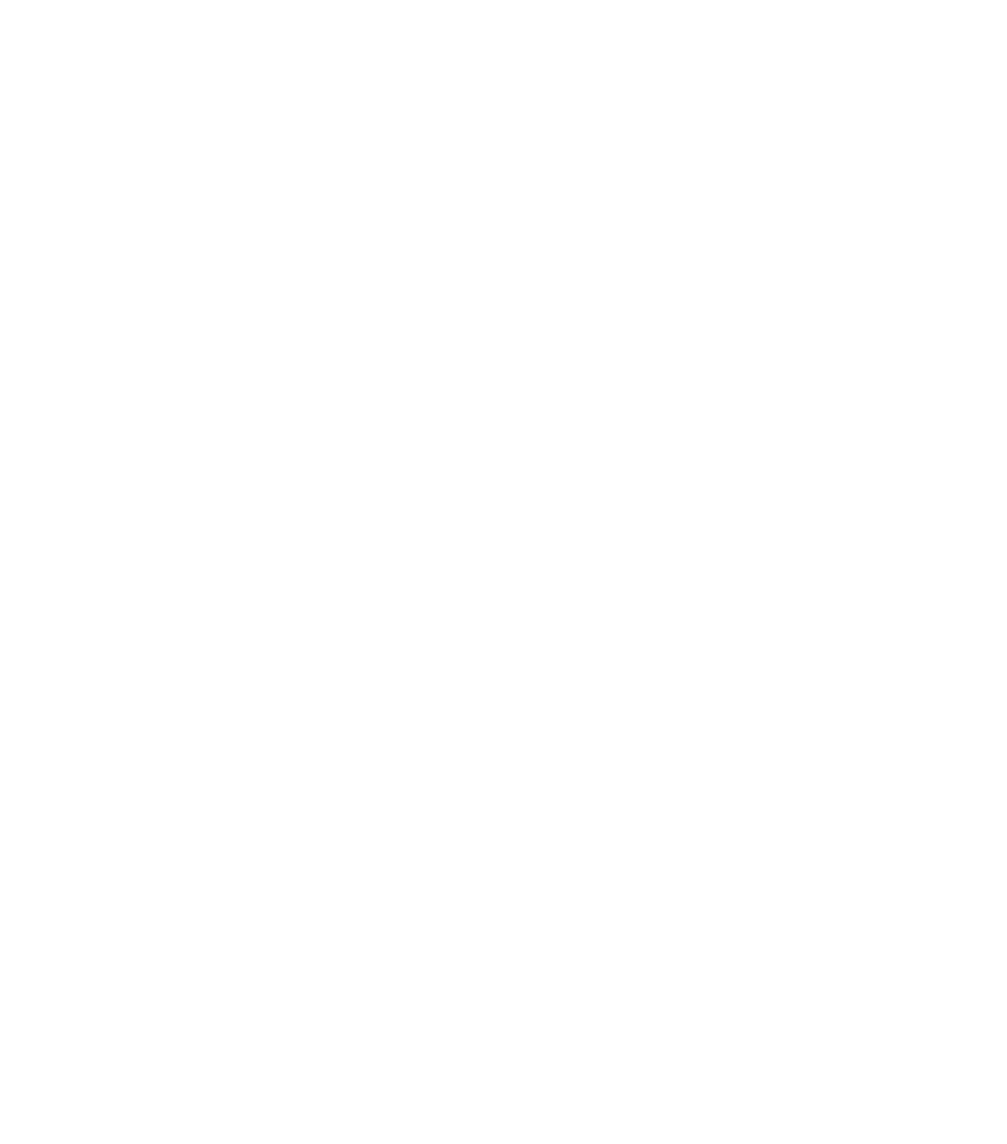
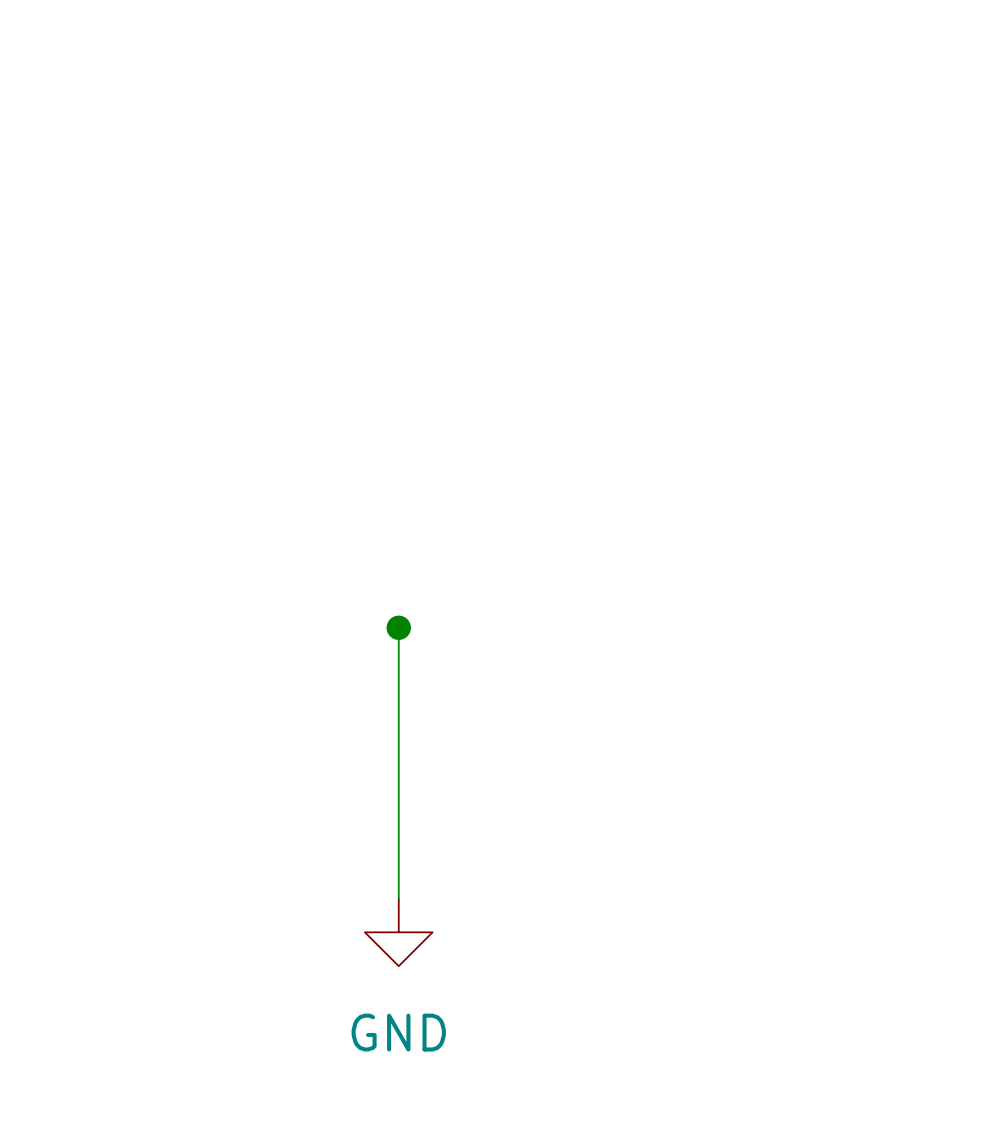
wire: none -> (398, 627) (398, 898)
junction: none -> (398, 627)
power symbol: none -> GND (398, 932)

